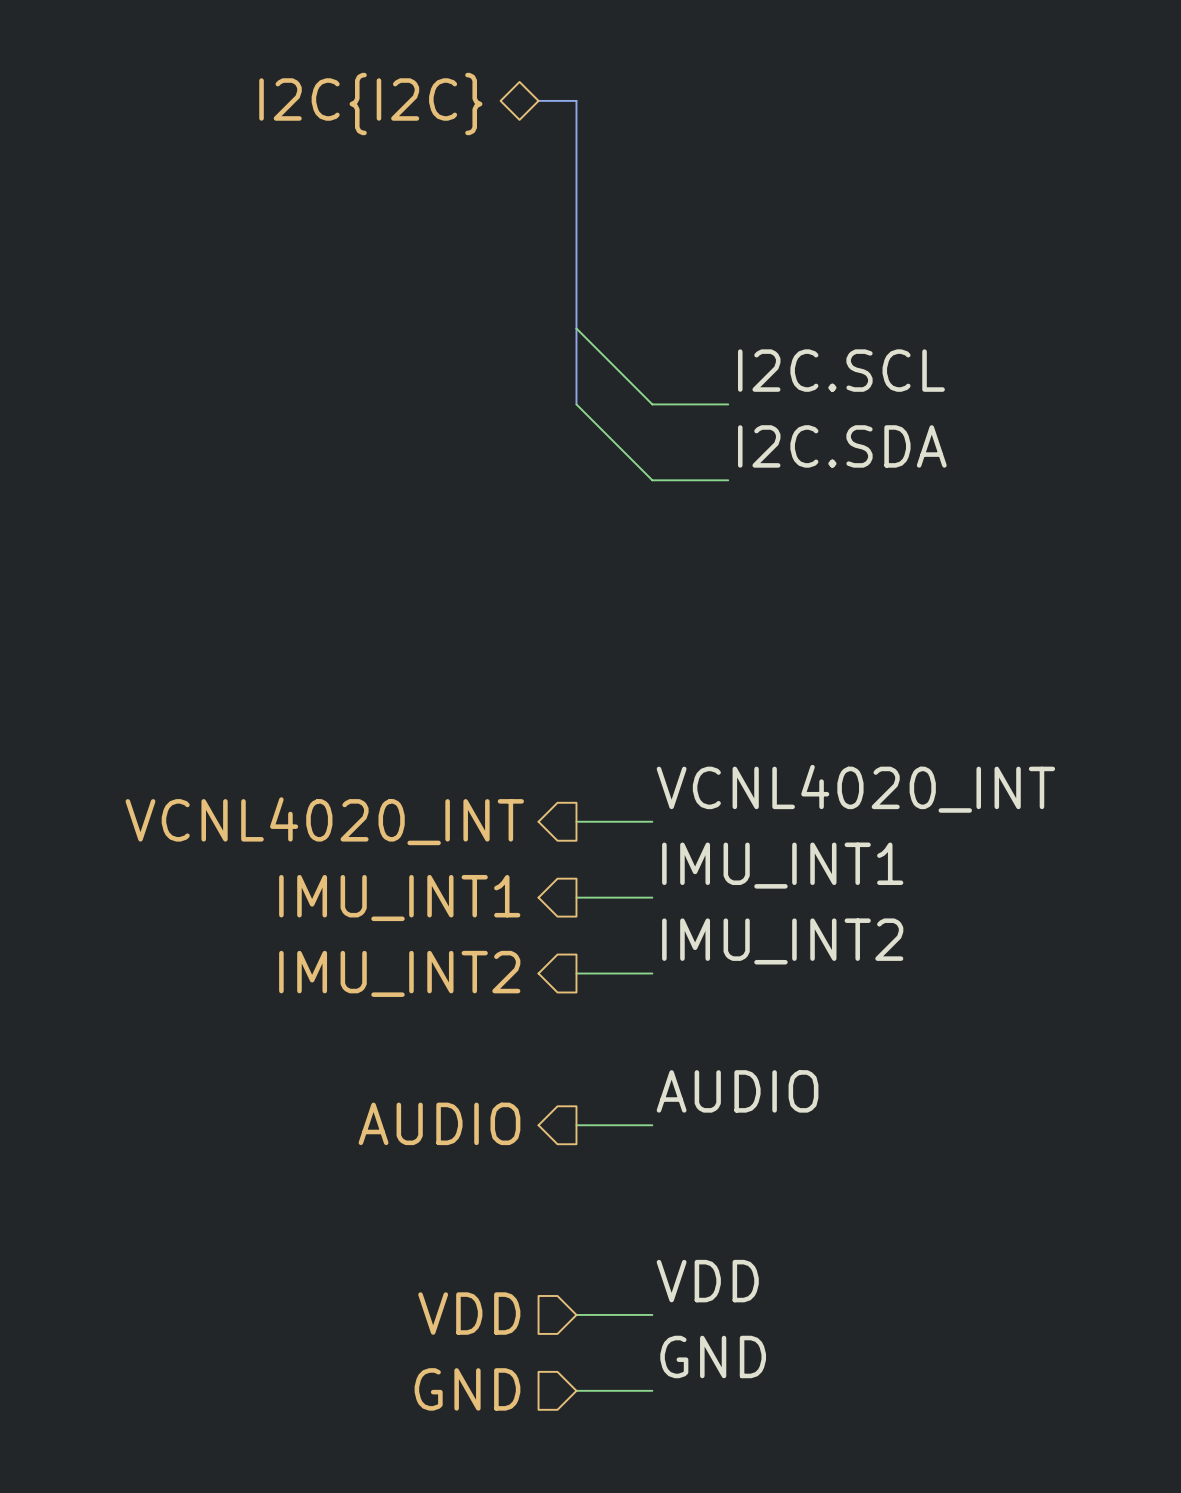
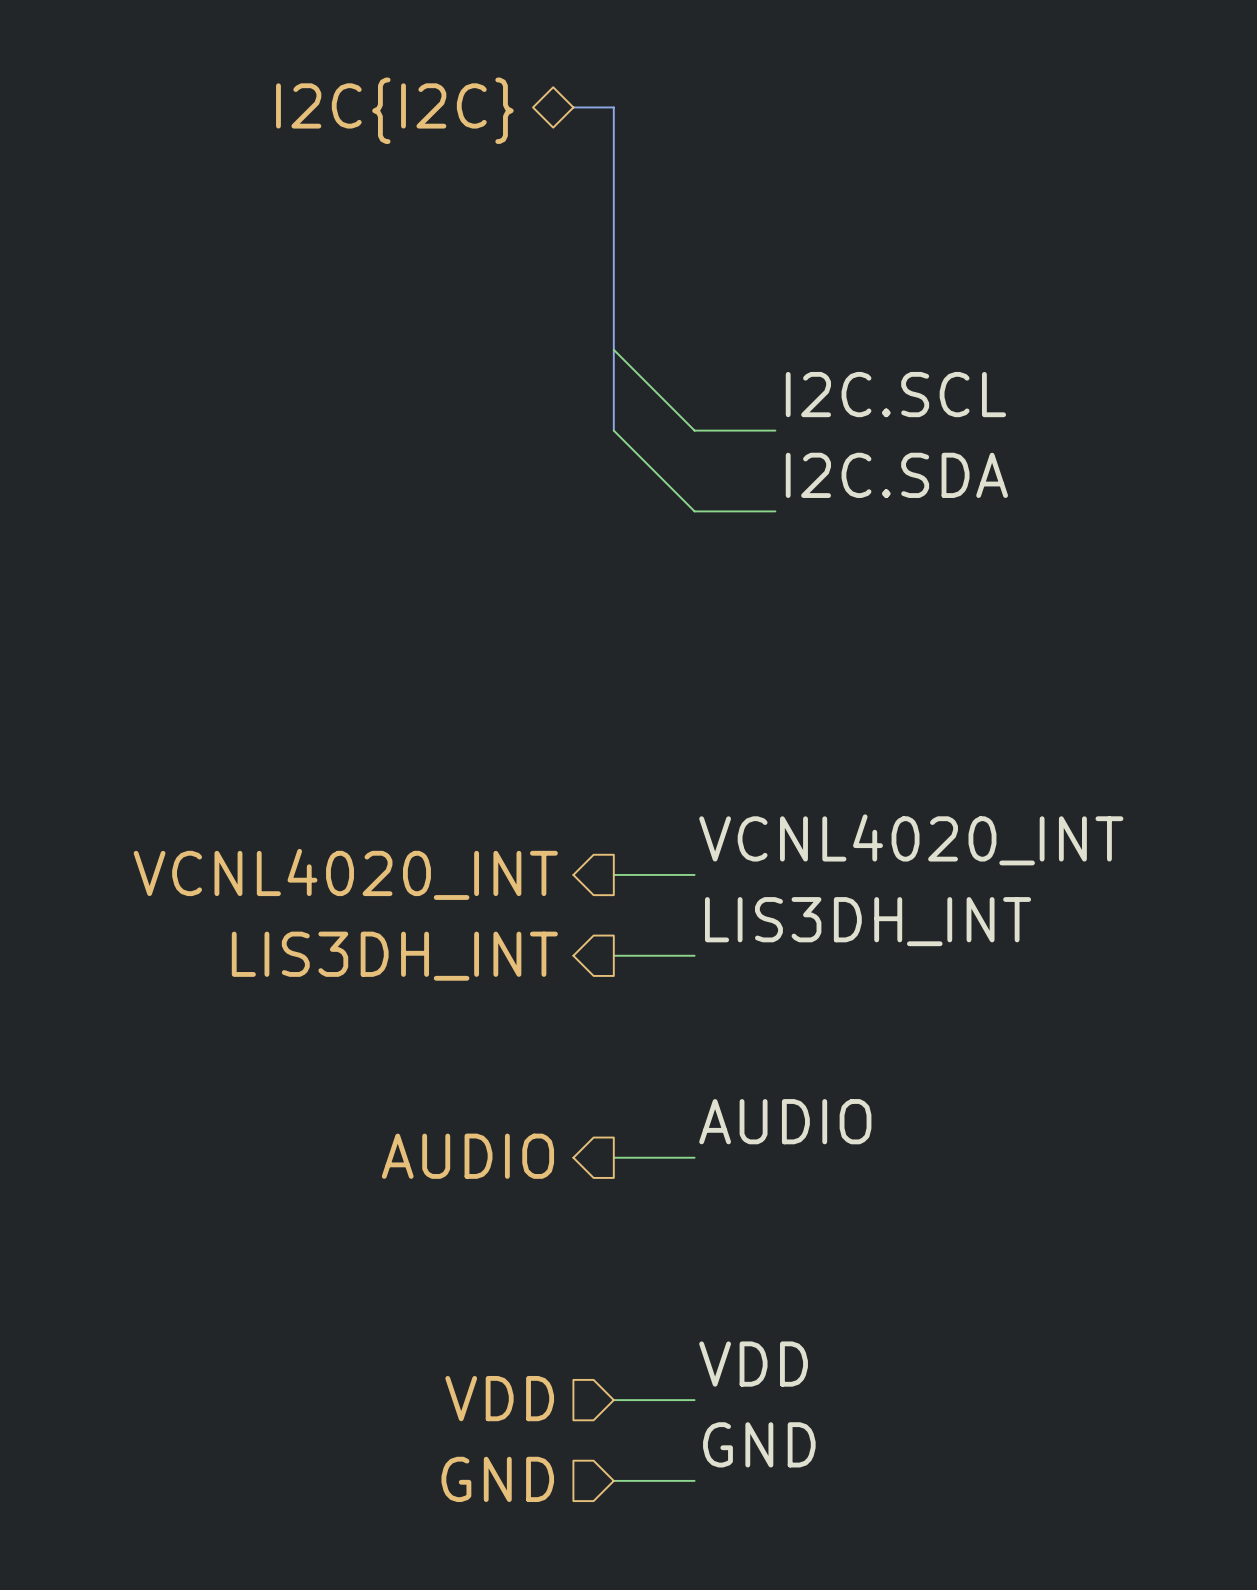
label: IMU_INT1 (782, 865) -> LIS3DH_INT (868, 921)
hierarchical label: IMU_INT1 (399, 898) -> LIS3DH_INT (394, 956)
label: IMU_INT2 (782, 941) -> none
hierarchical label: IMU_INT2 (399, 973) -> none
wire: (576, 973) (652, 973) -> none
label position: AUDIO (737, 1091) -> AUDIO (785, 1121)
hierarchical label position: AUDIO (439, 1123) -> AUDIO (467, 1156)
wire: (576, 1125) (652, 1125) -> (613, 1157) (694, 1157)

